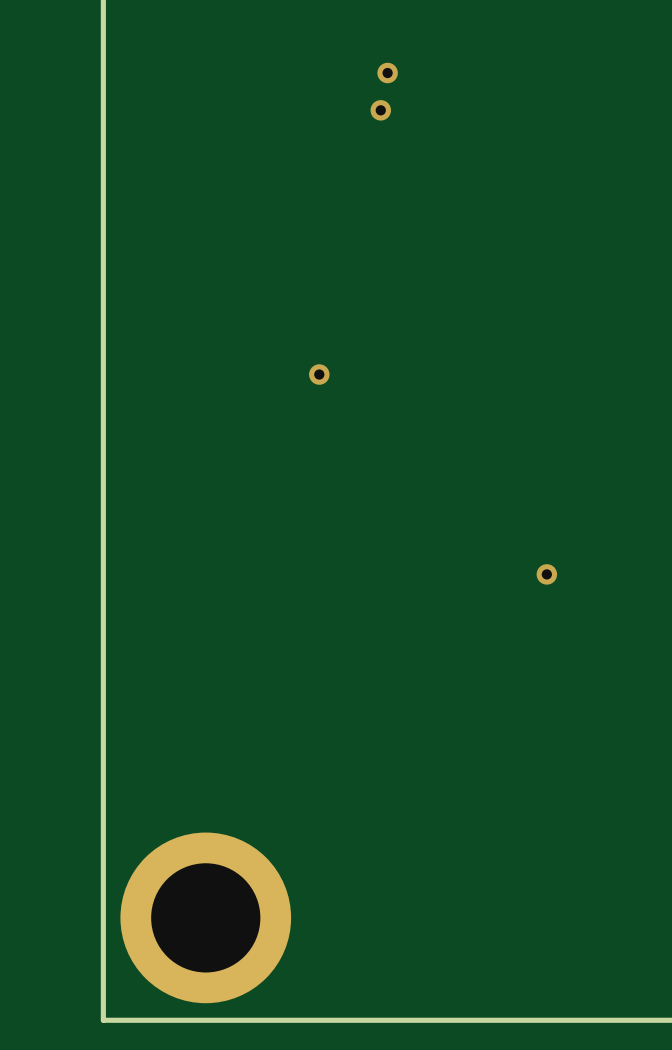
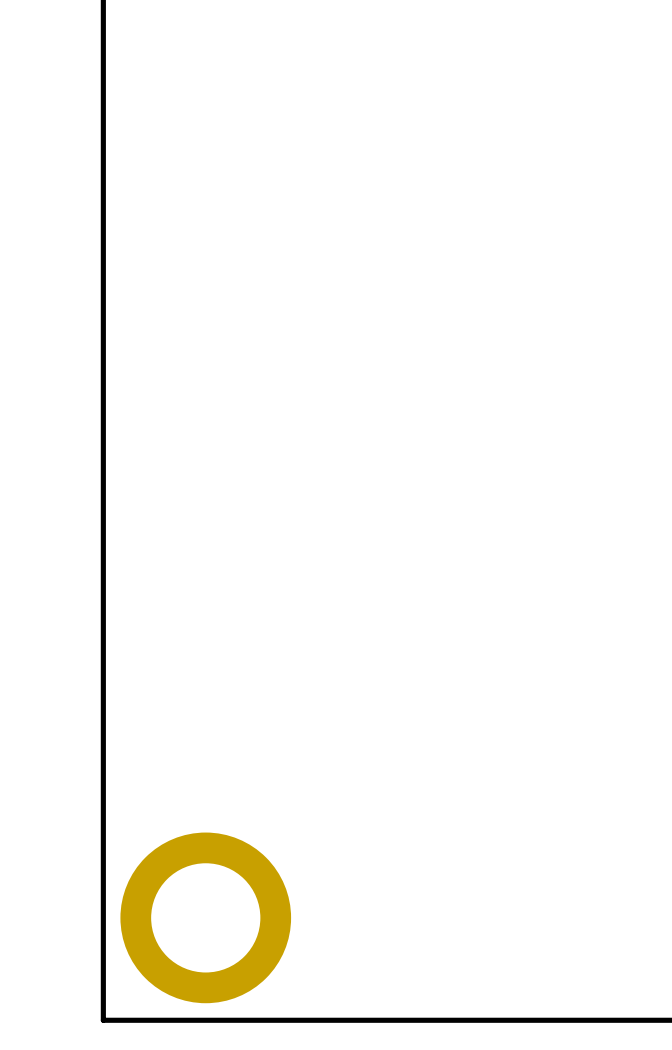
via: (387, 73) -> none
via: (380, 110) -> none
via: (319, 374) -> none
via: (546, 574) -> none

